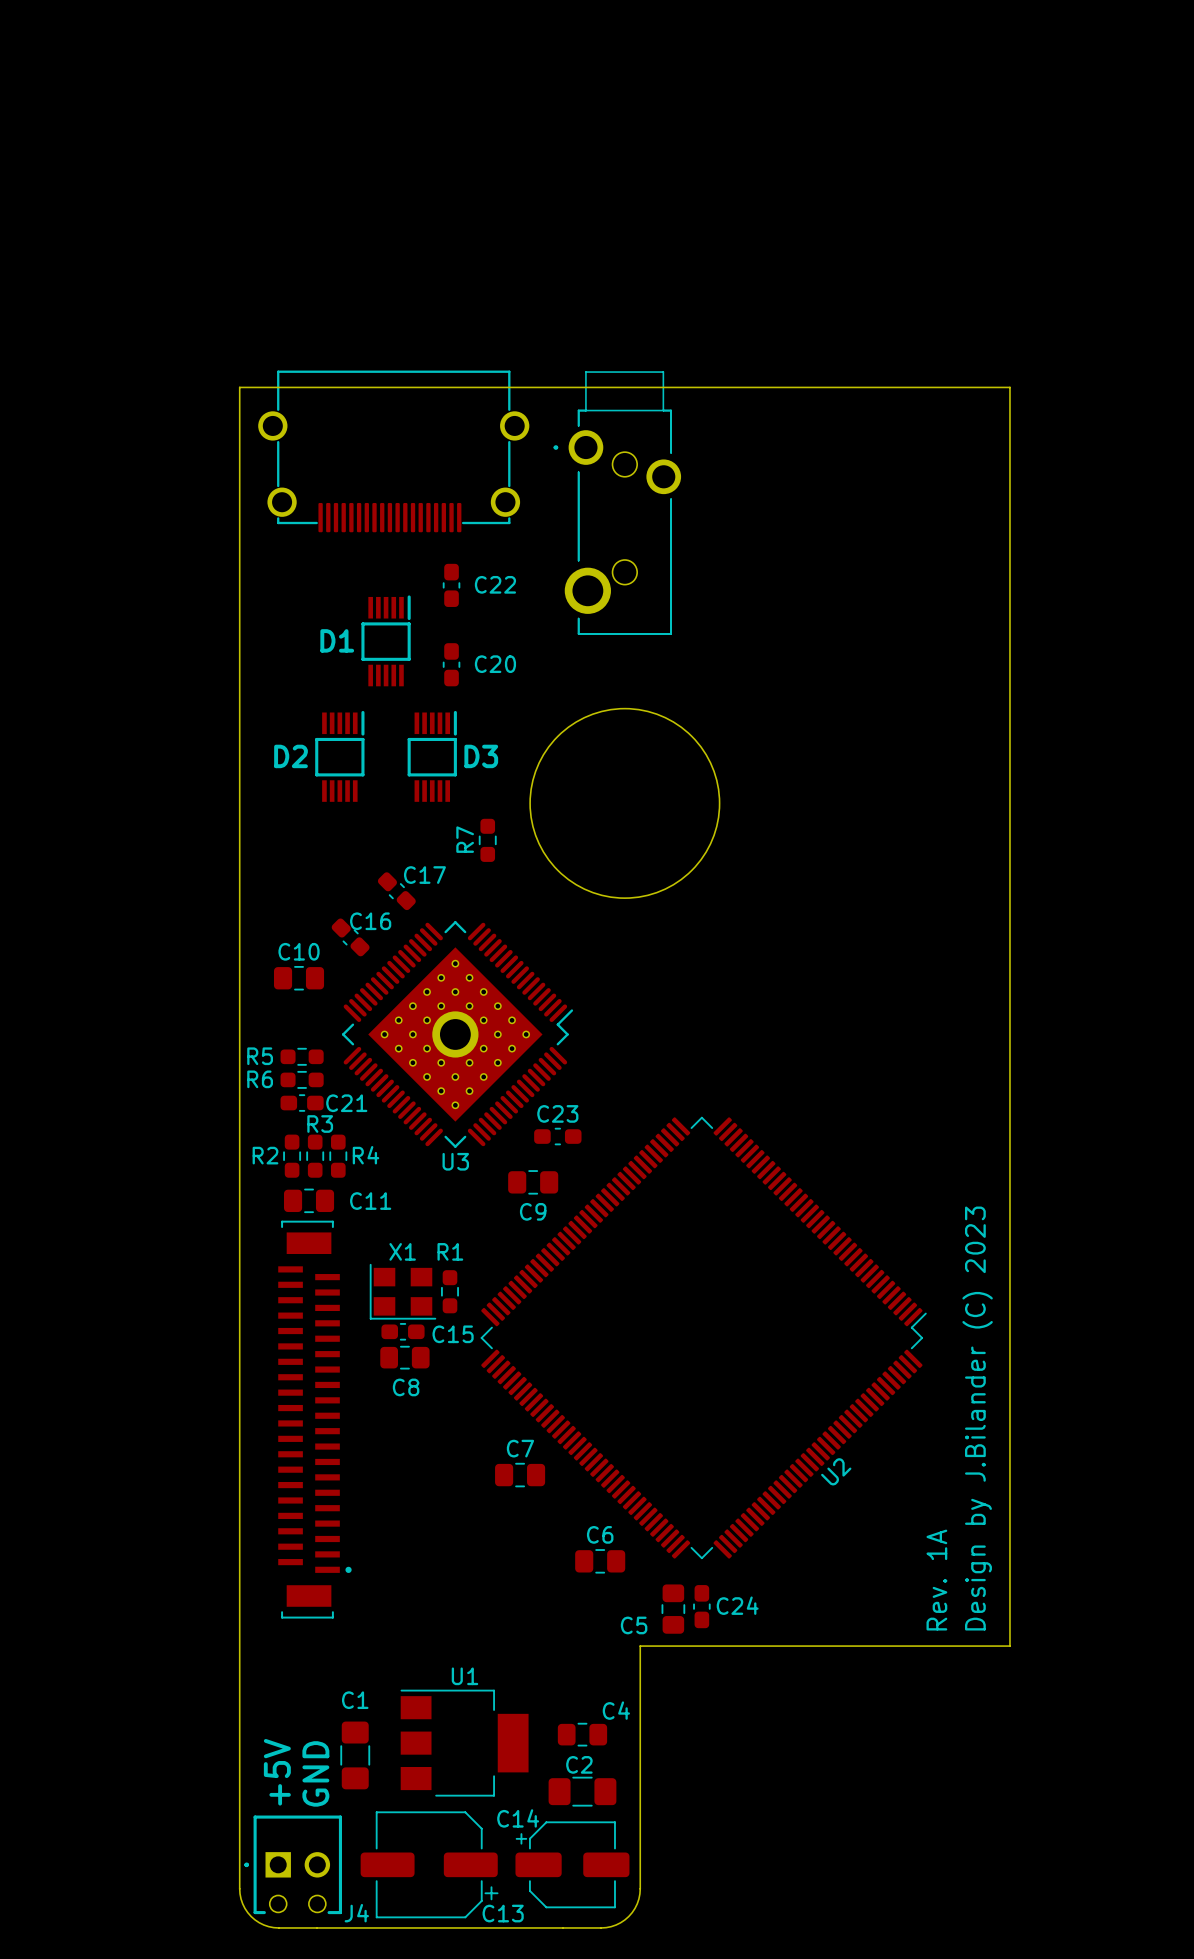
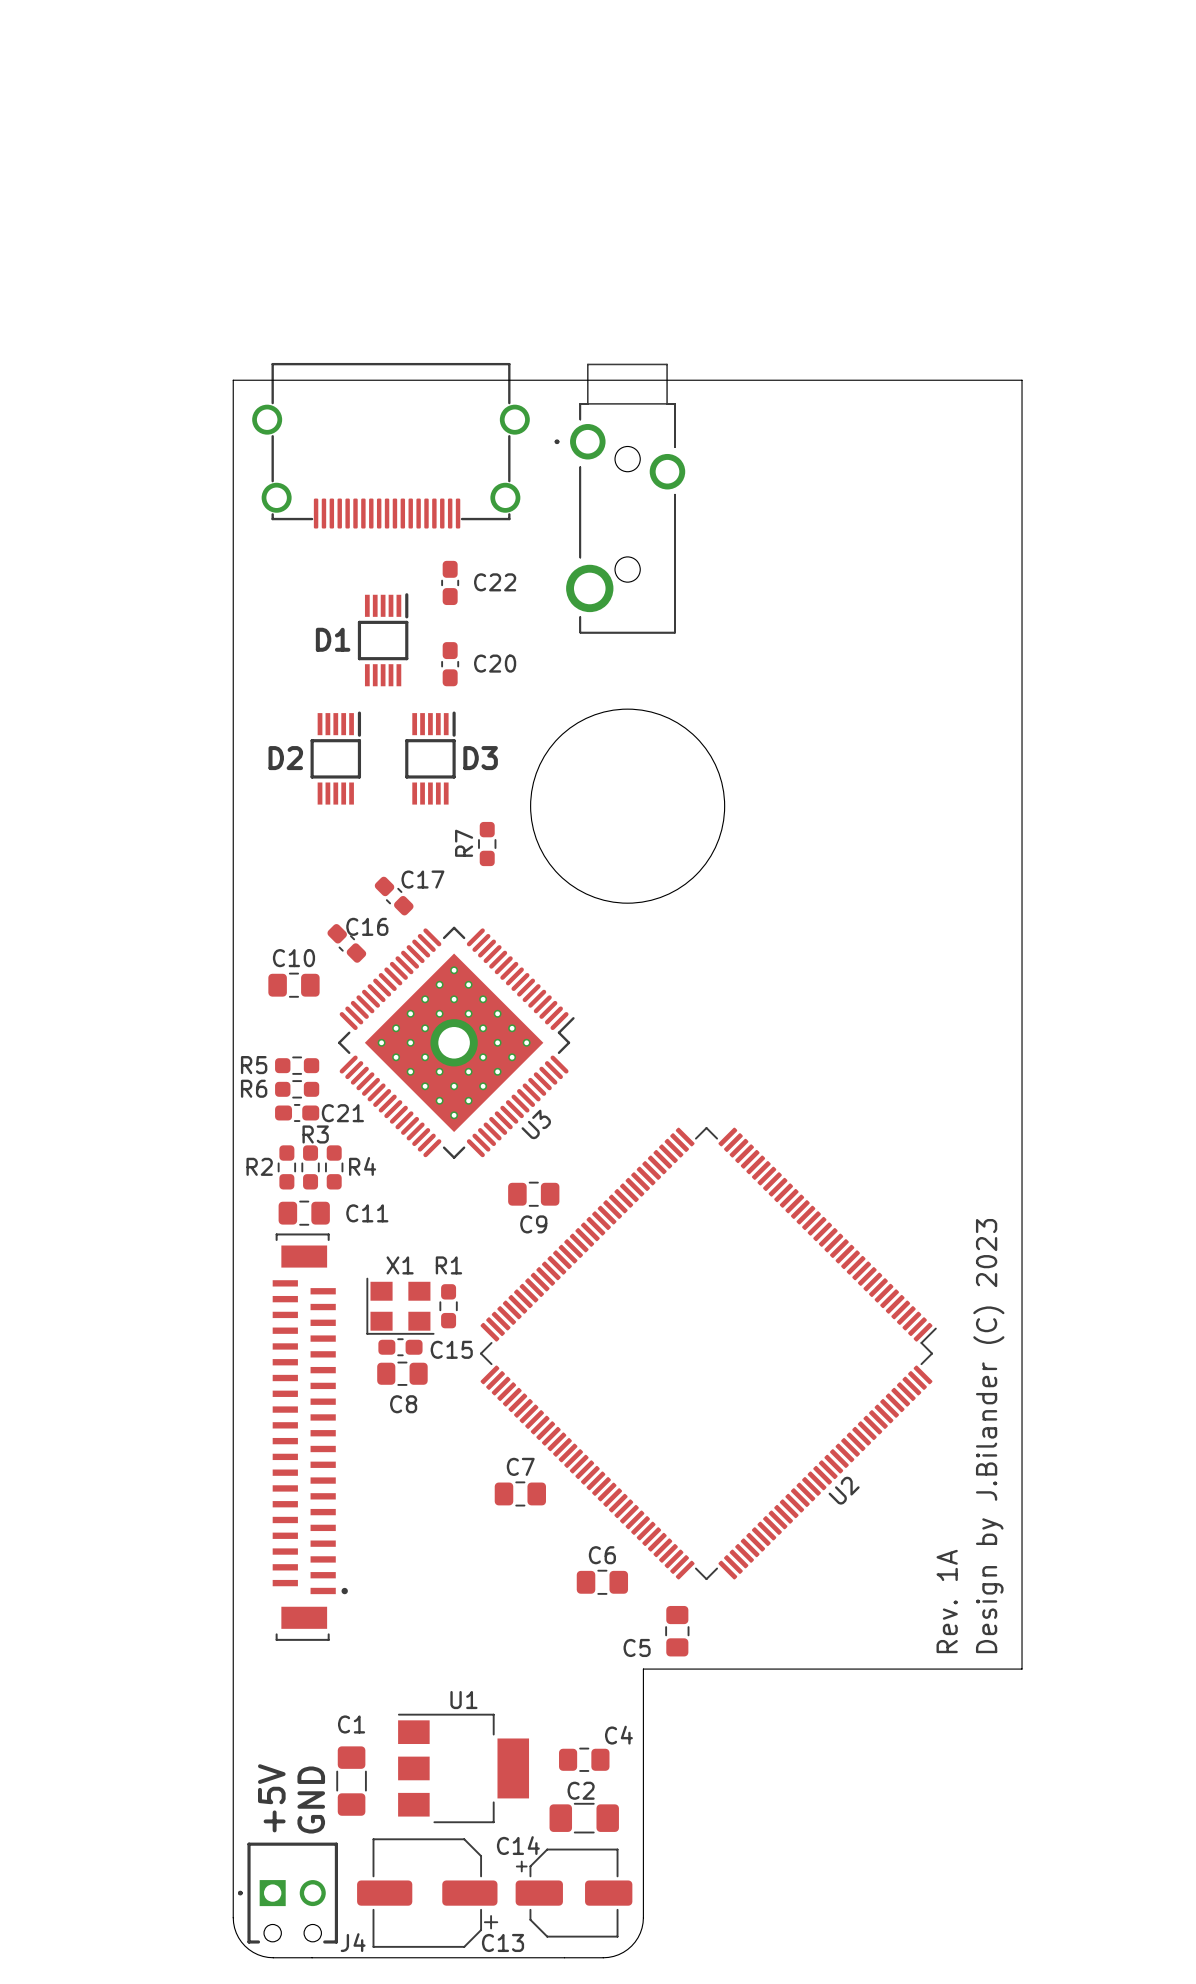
C23: (557, 1136) -> none
U3 name rotation: 0° (455, 1161) -> 45° counterclockwise (536, 1124)
U3 name position: U3 (455, 1161) -> U3 (536, 1124)
C24: (701, 1606) -> none

